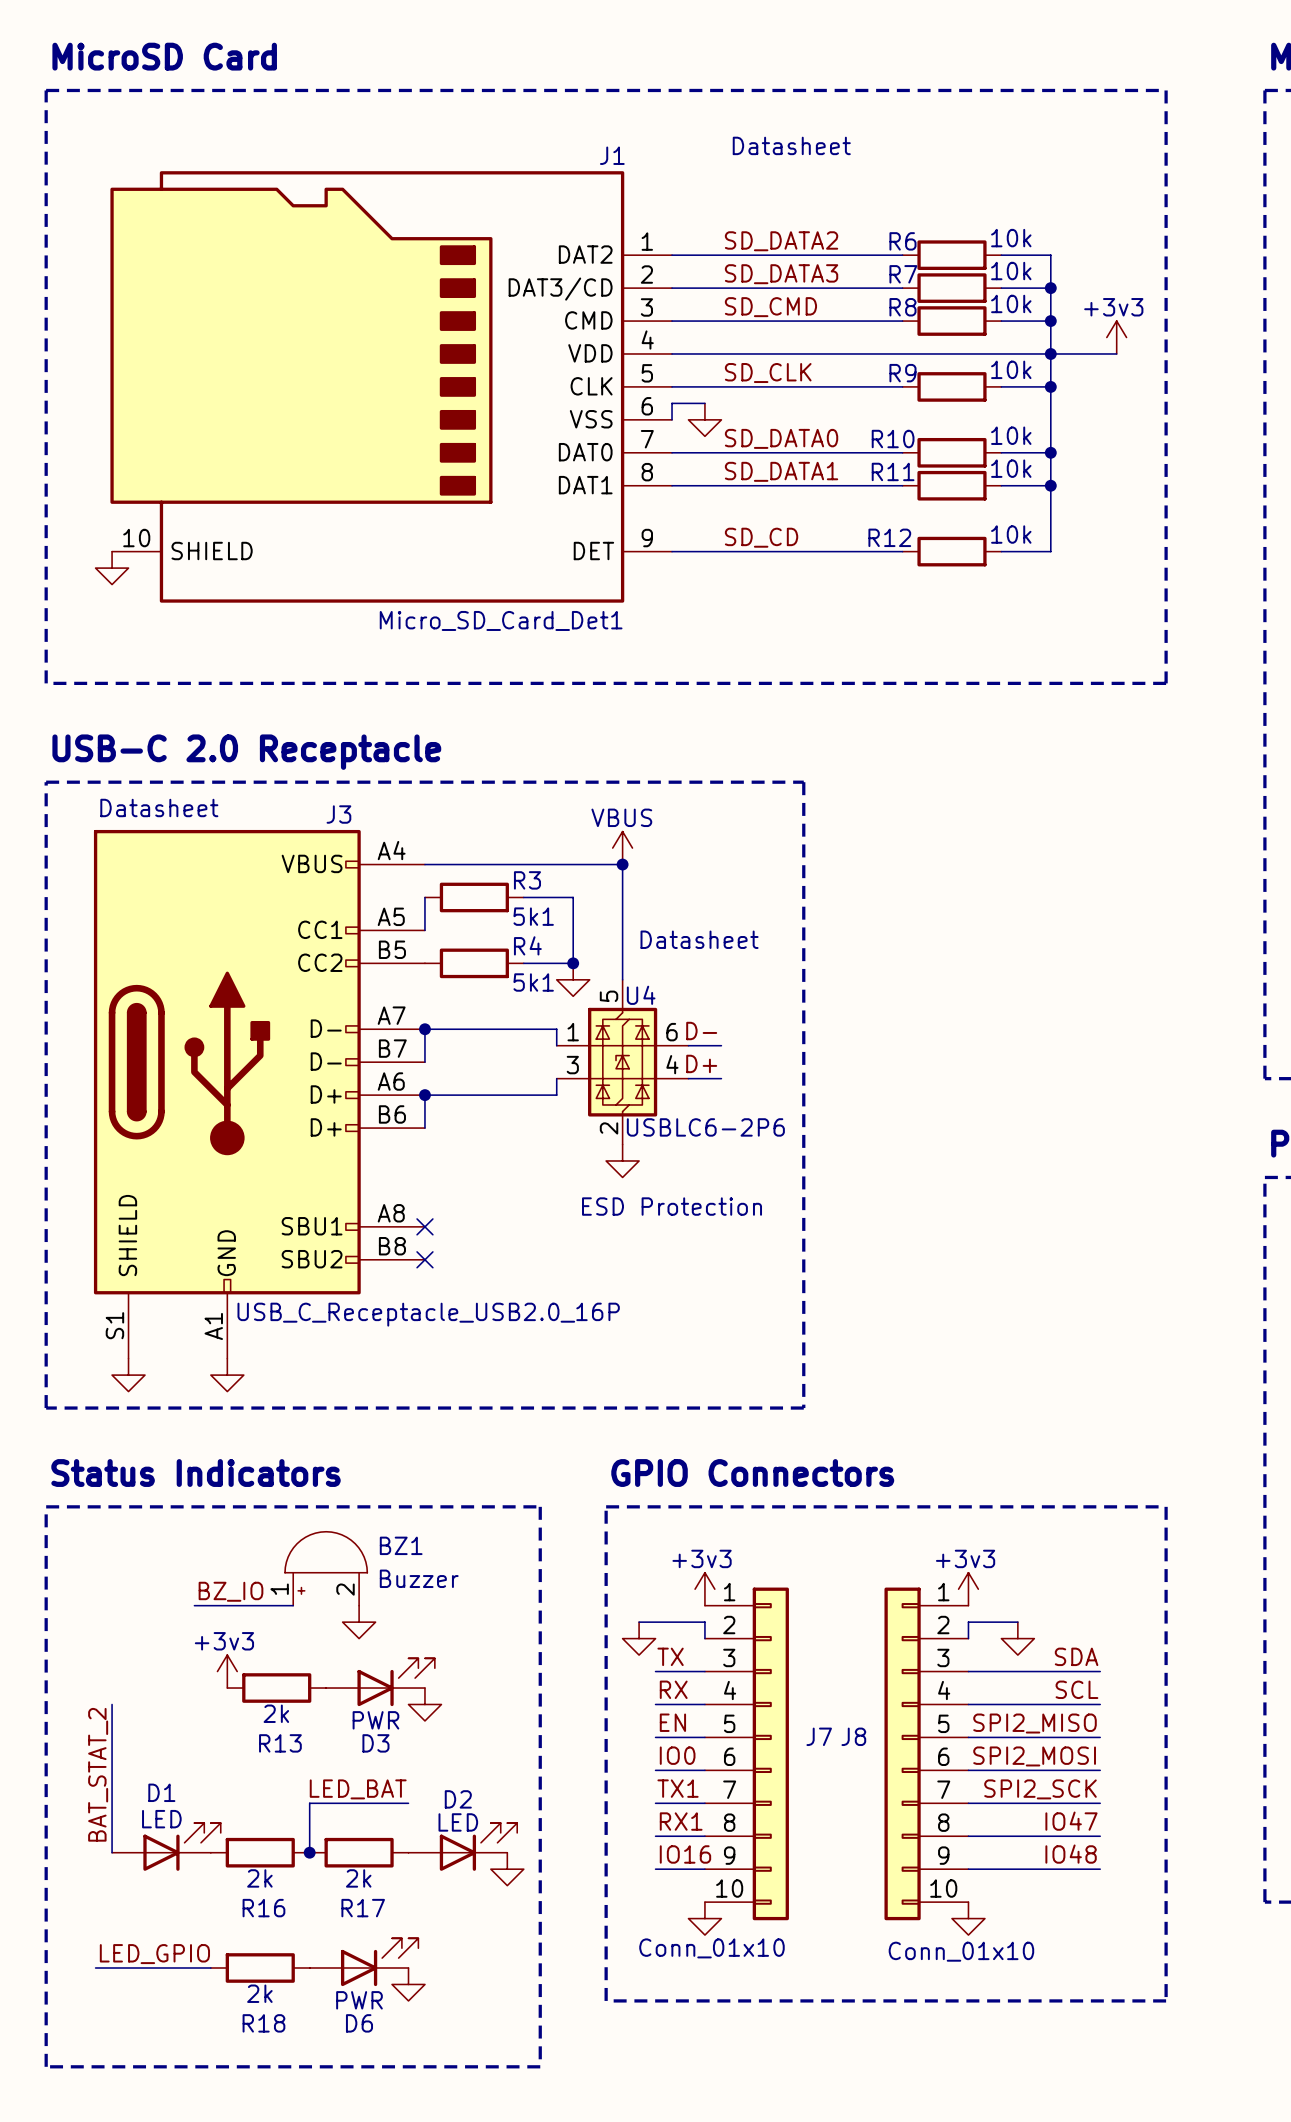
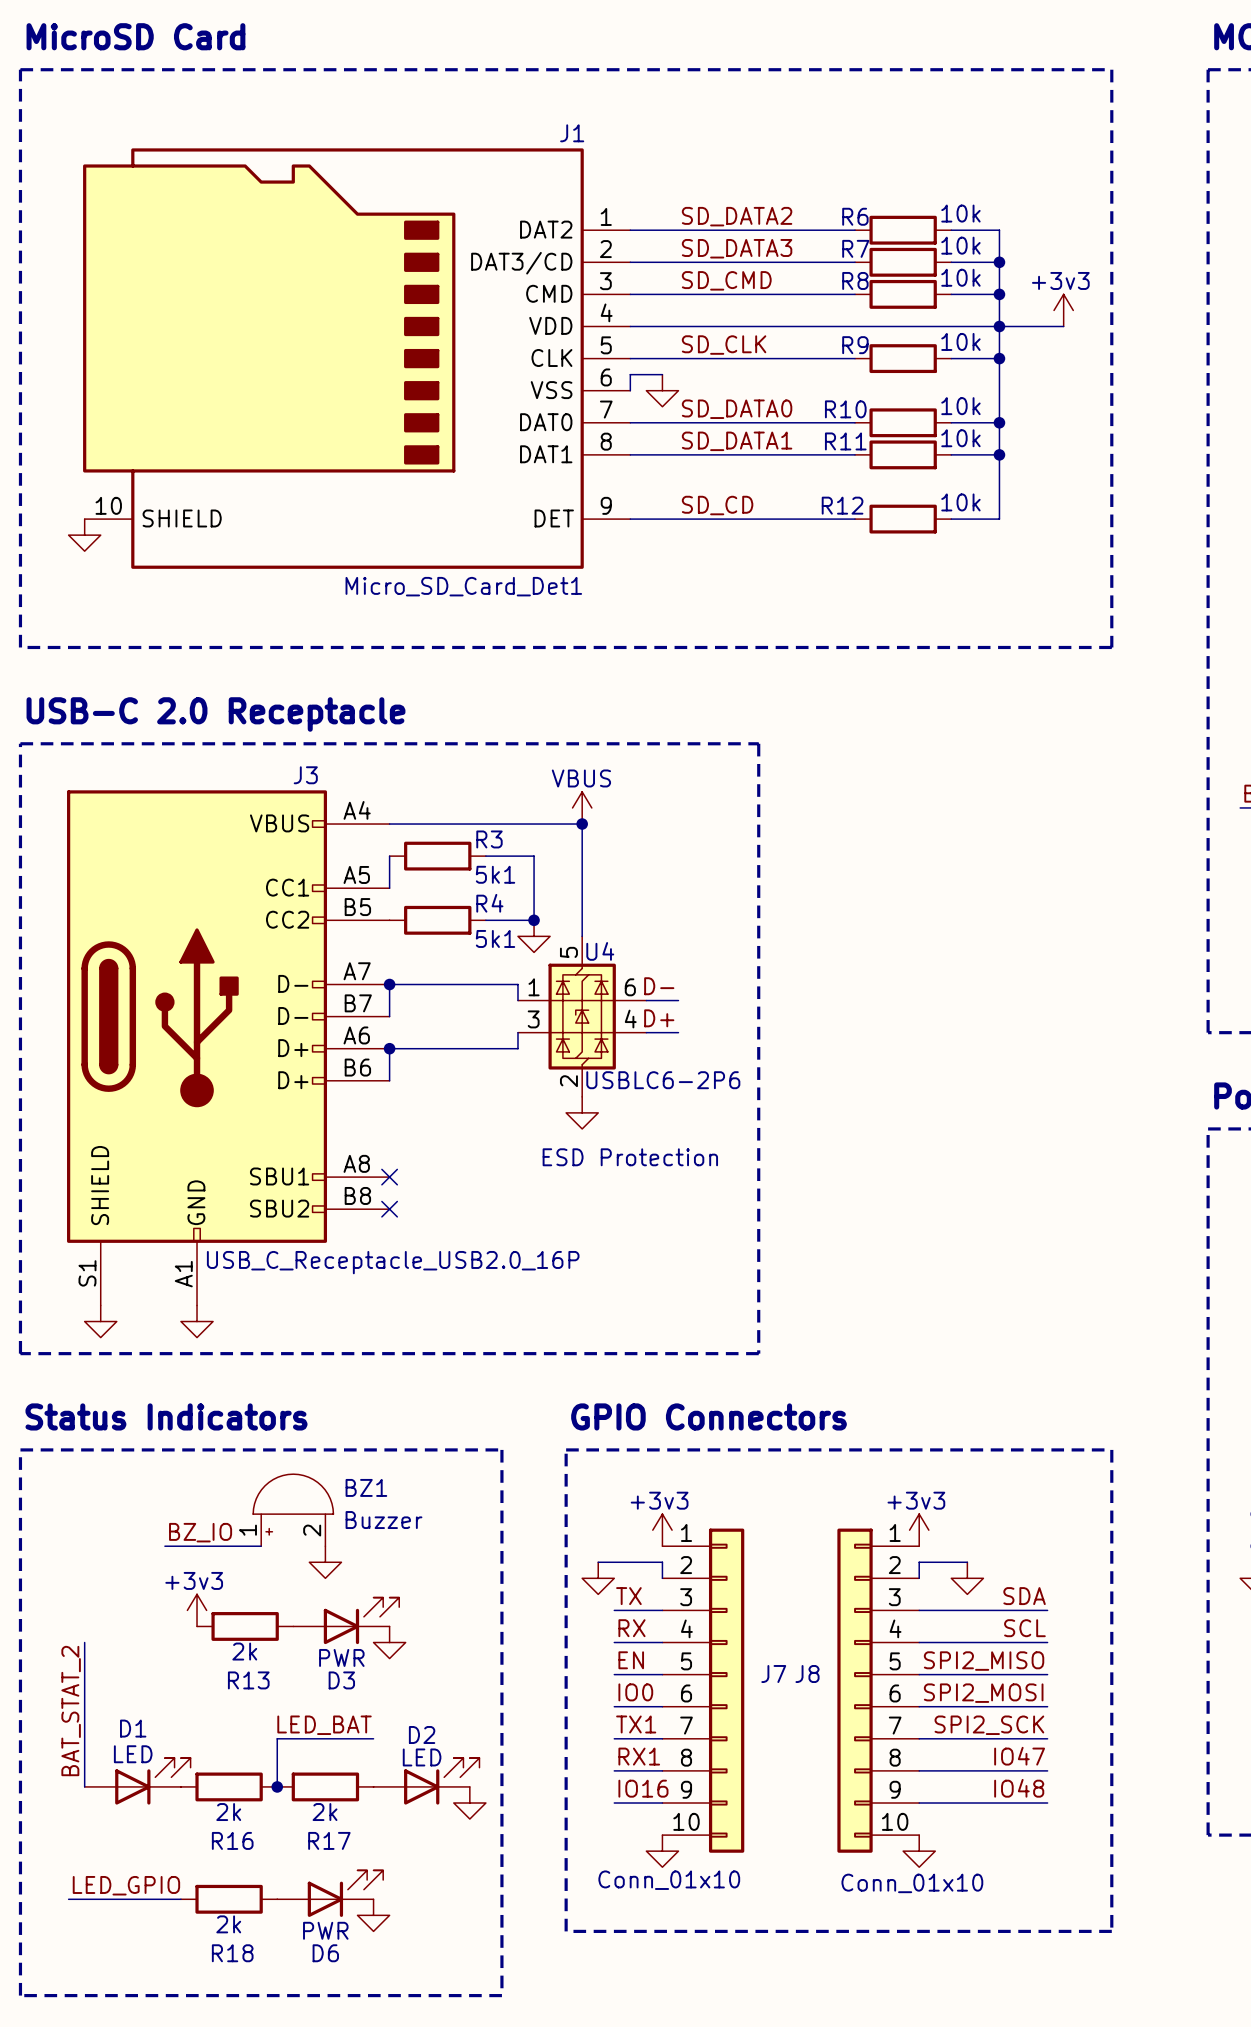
text: Datasheet (791, 145) -> none
text: Datasheet (159, 807) -> none
text: Datasheet (699, 939) -> none

